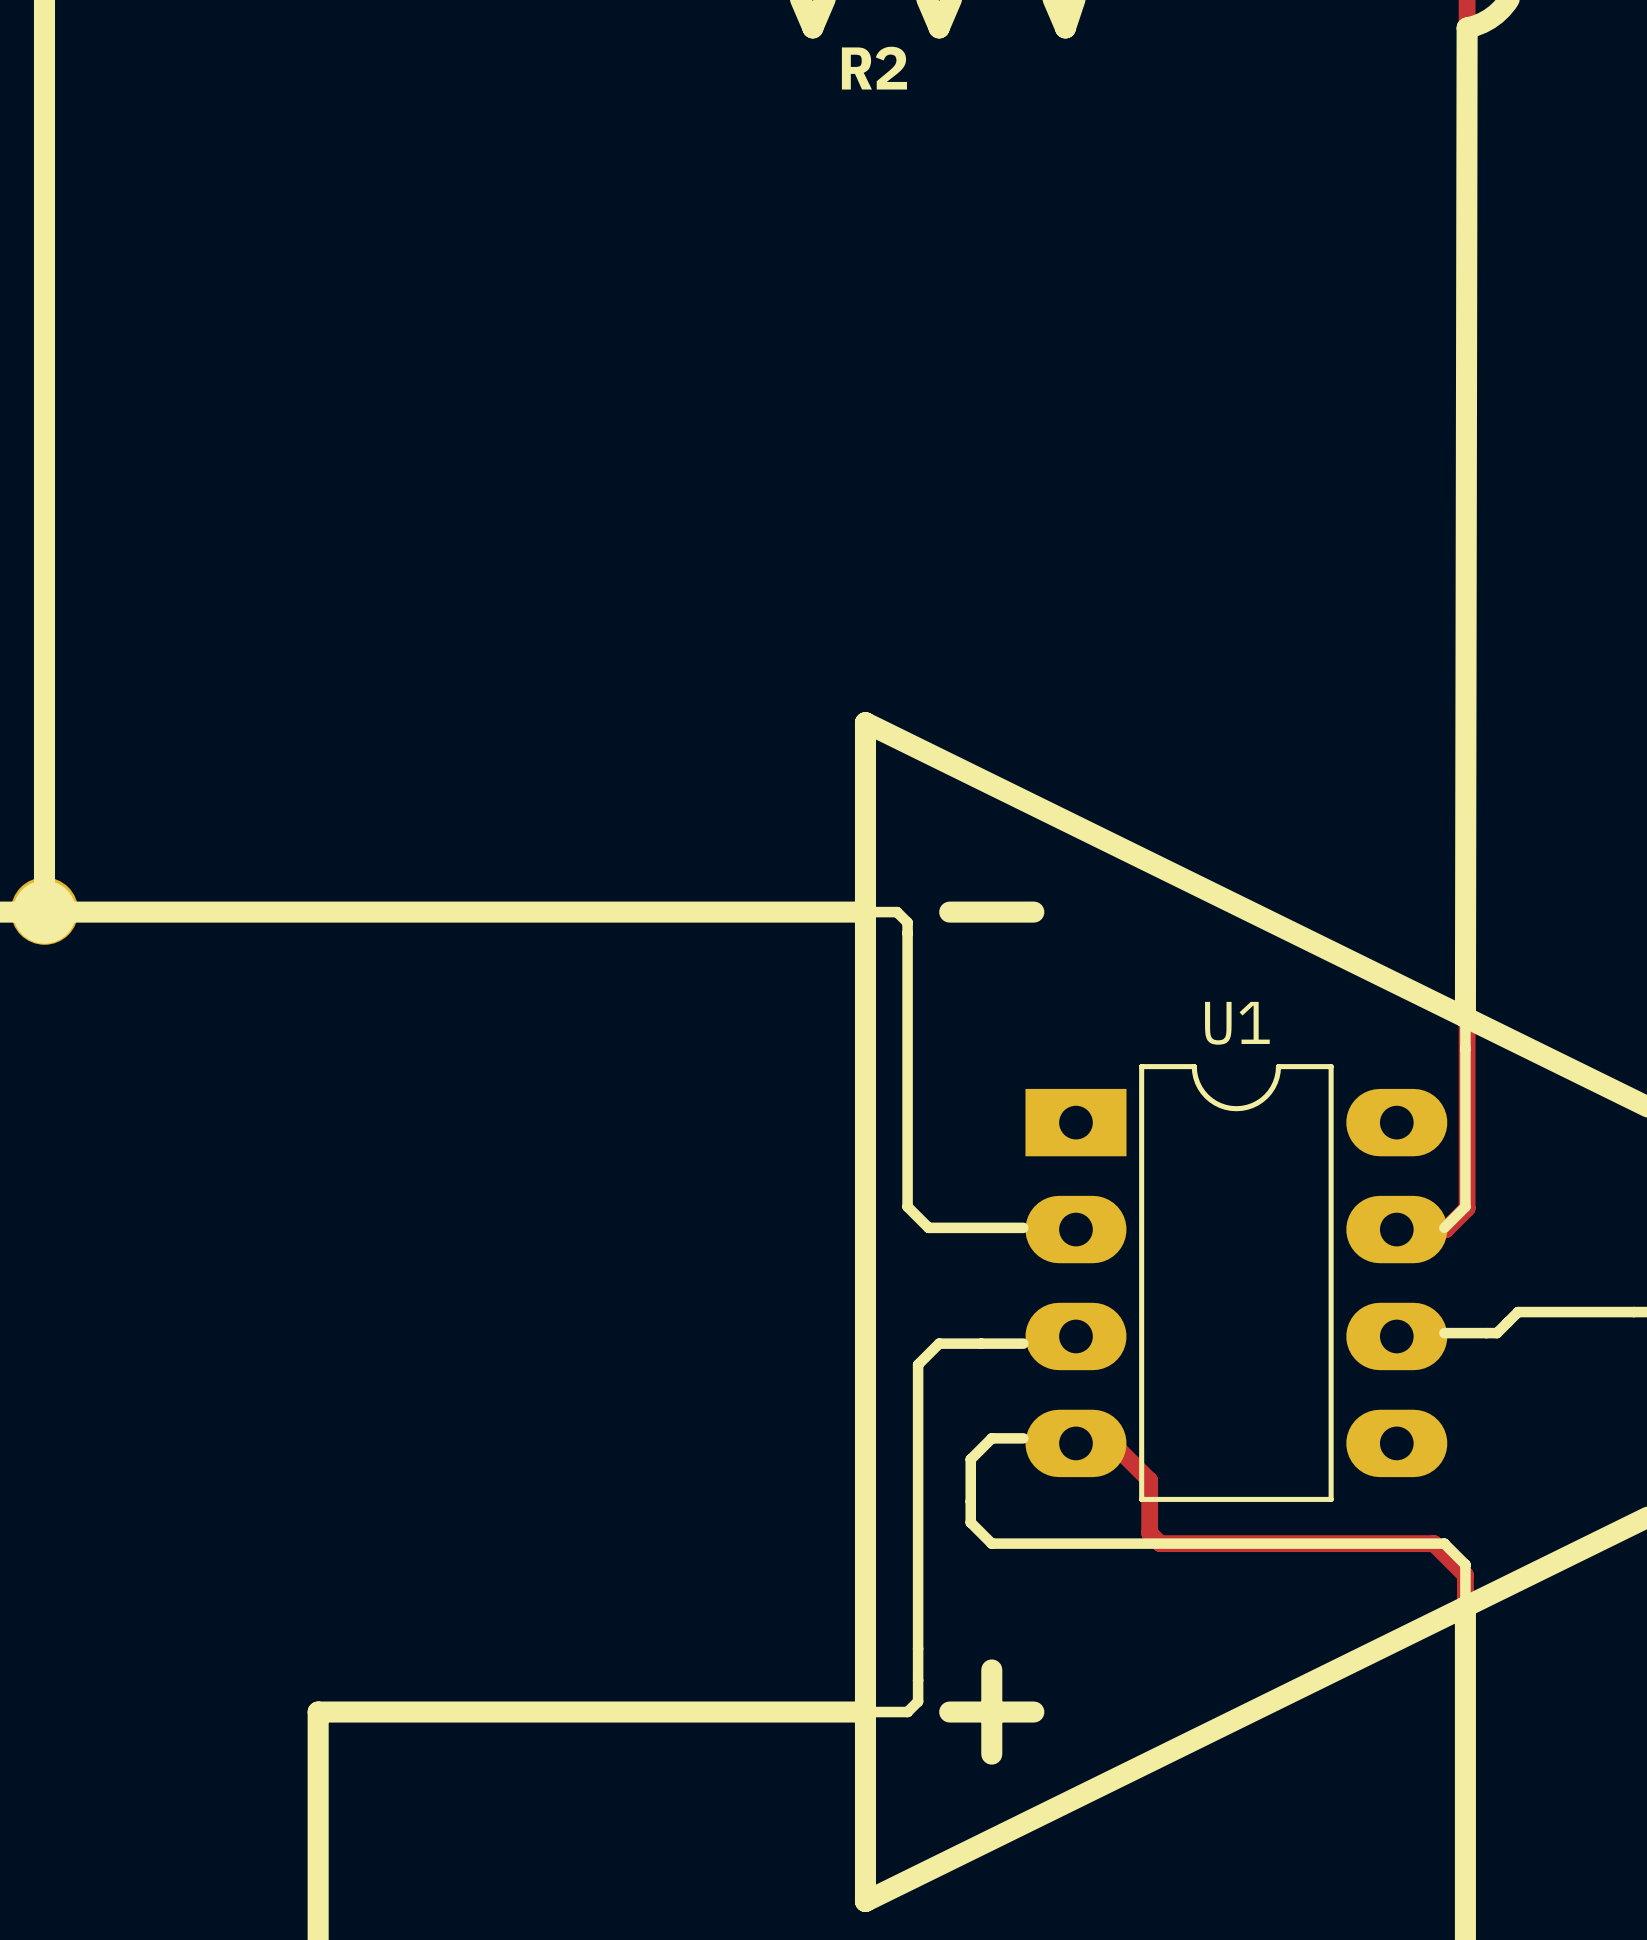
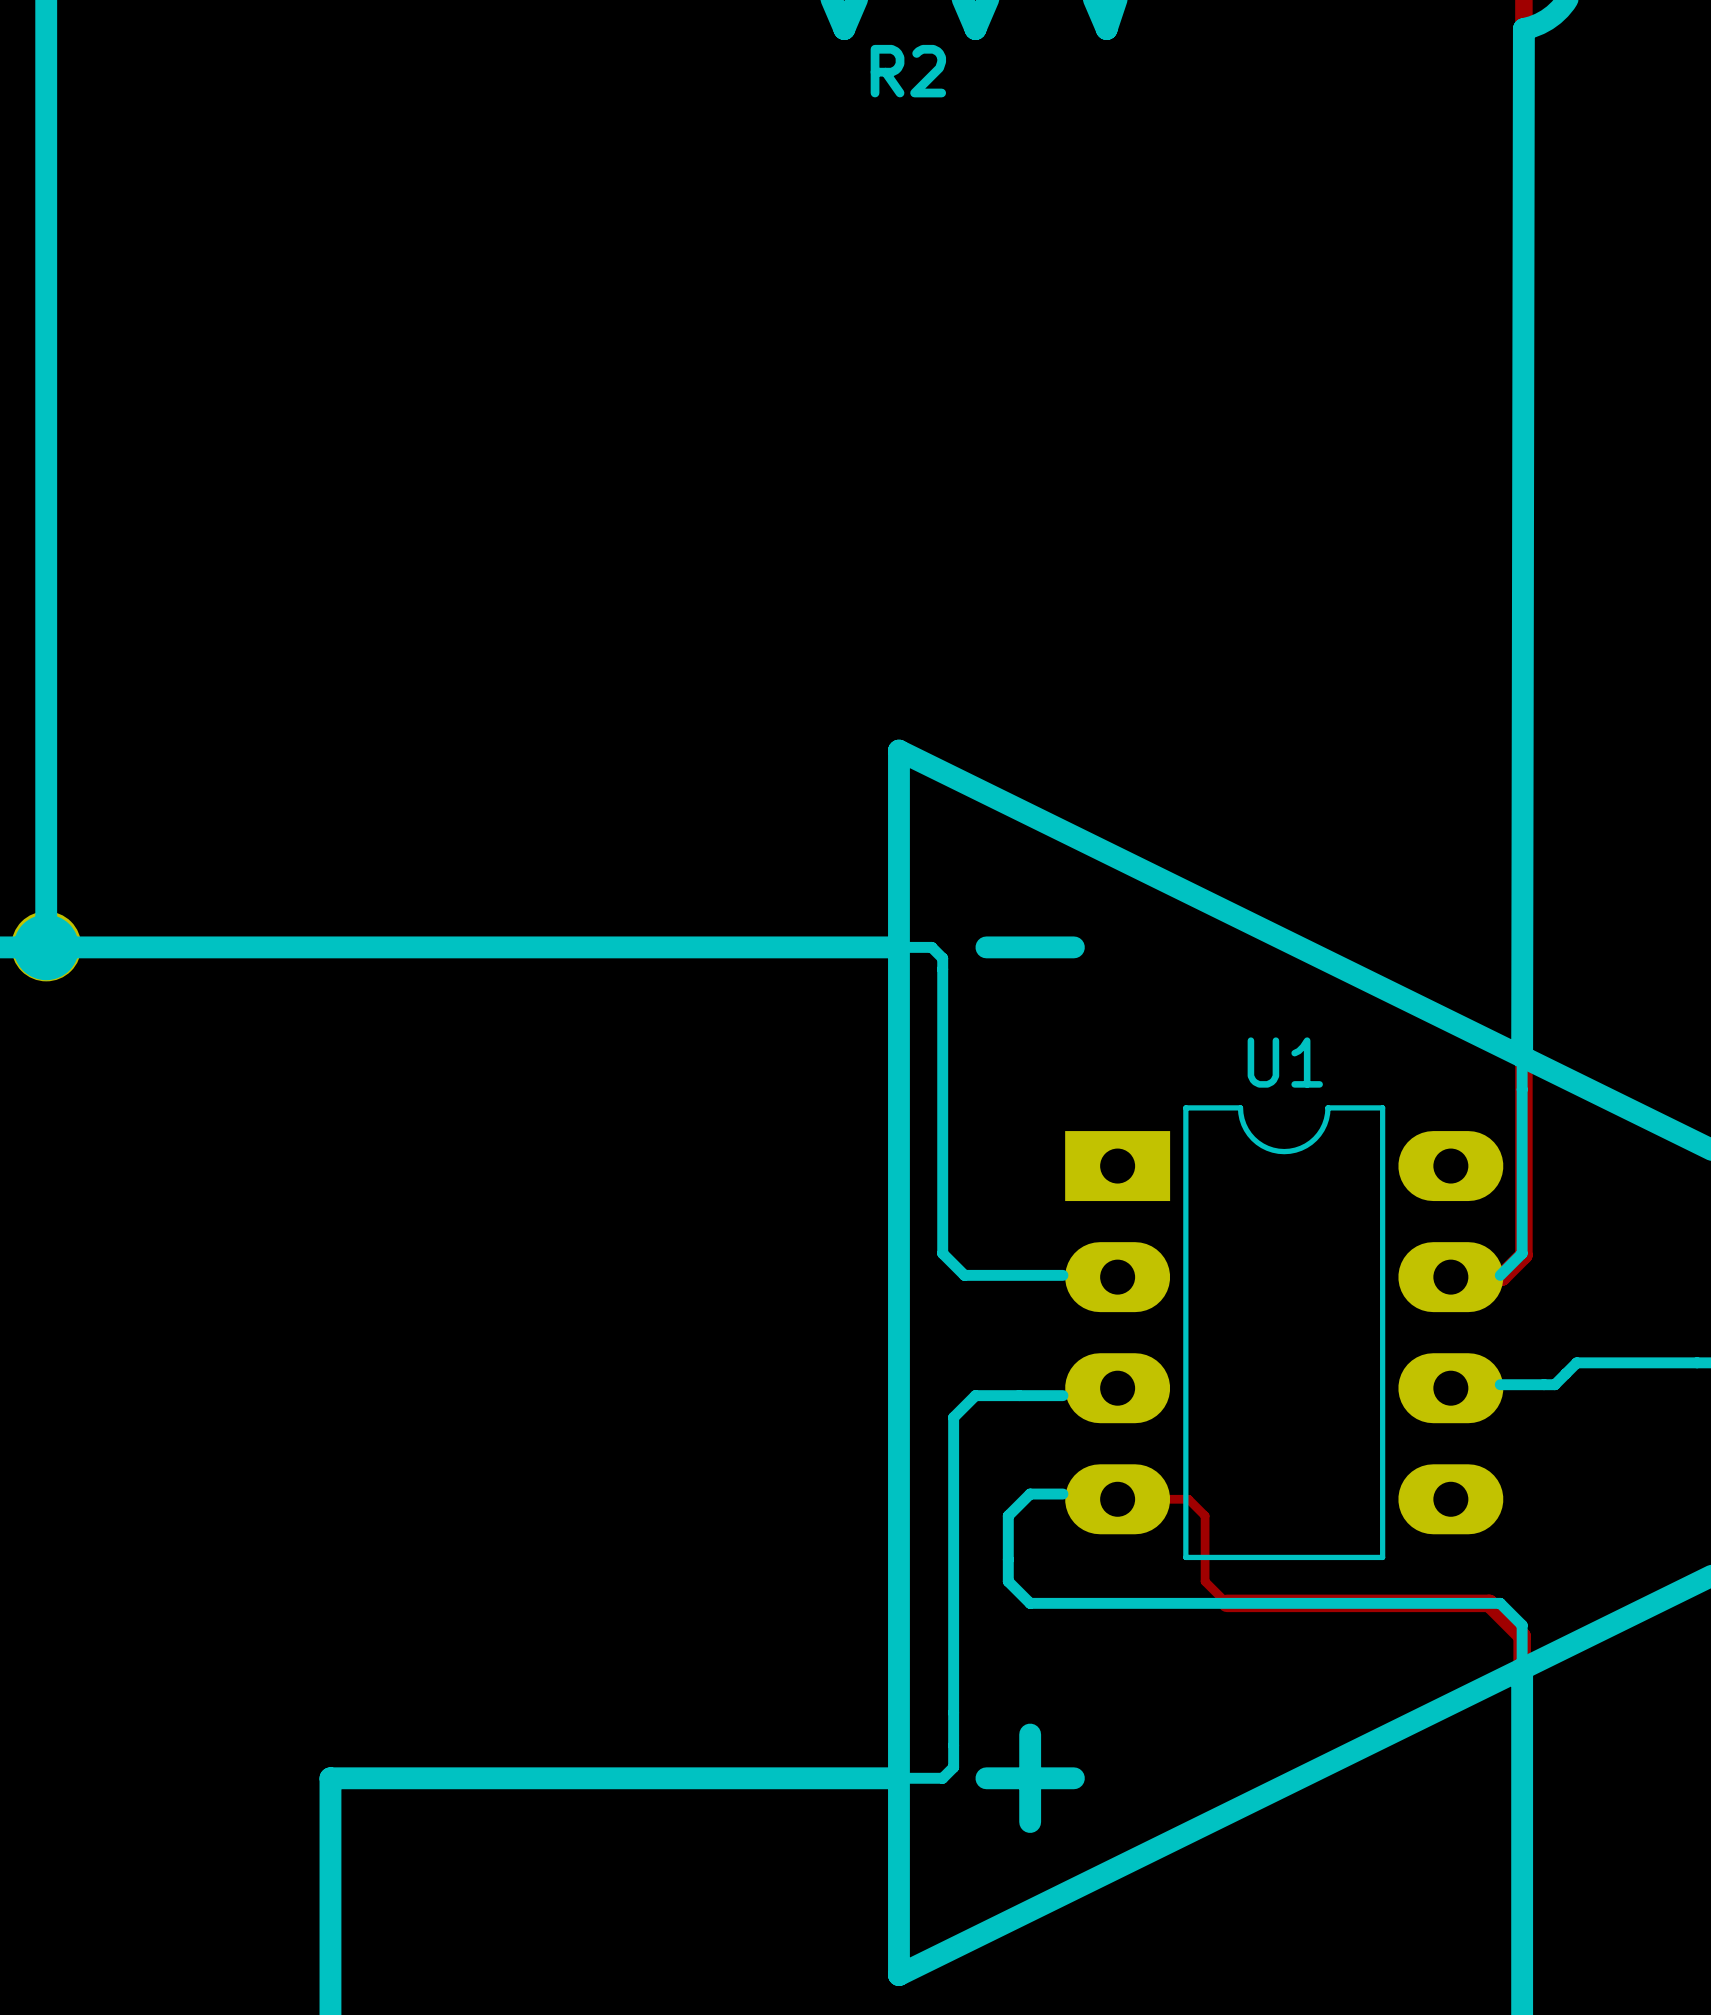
track: (1112, 1443) (1149, 1480) (1149, 1533) (1160, 1543) (1181, 1543) -> (1155, 1499) (1188, 1499) (1205, 1515) (1205, 1581) (1226, 1603)

